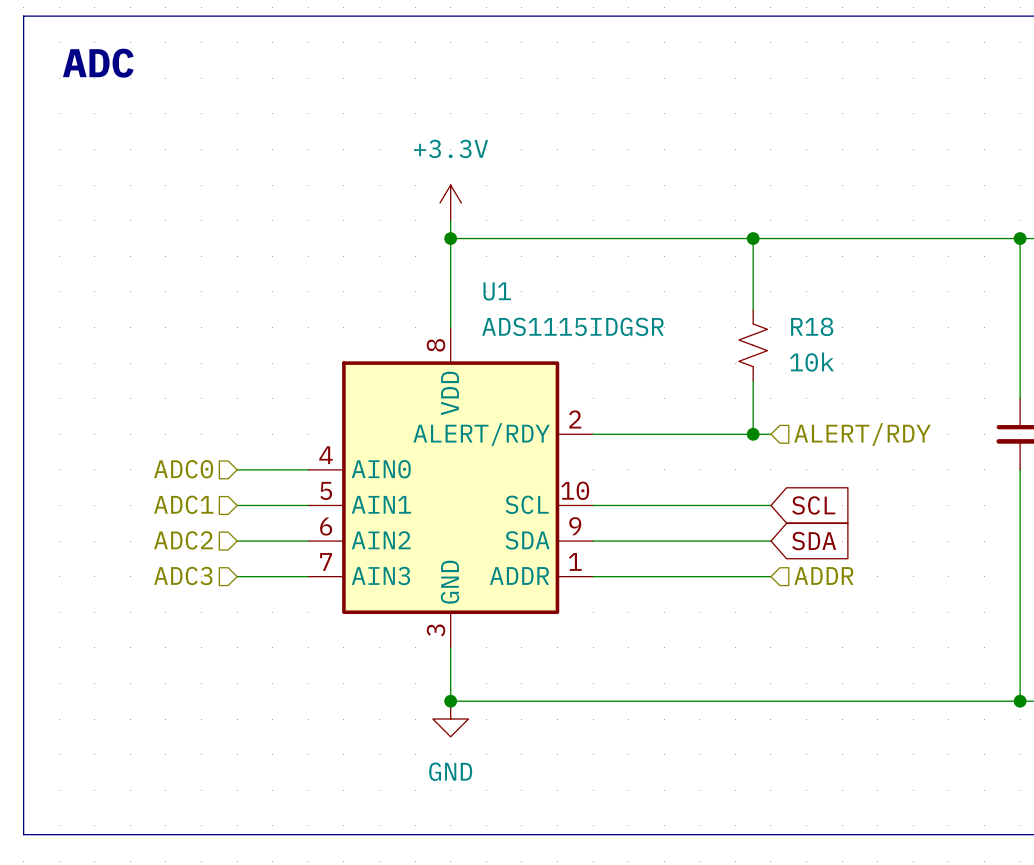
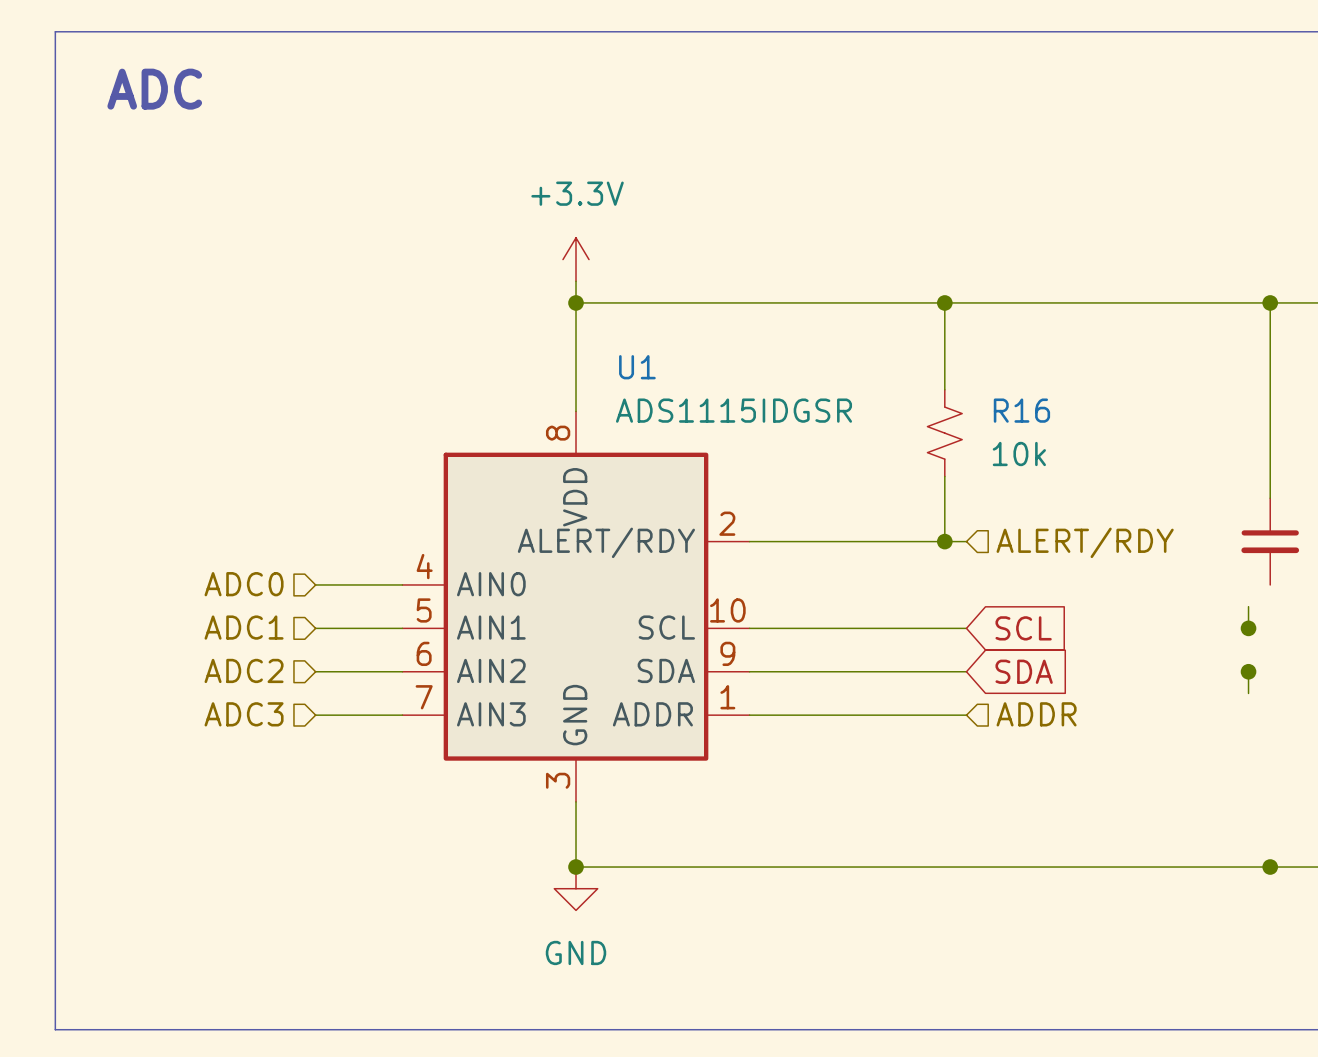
R18 name: R18 (812, 326) -> R16 (1021, 410)
wire: (1020, 469) (1020, 701) -> none
wire: none -> (1248, 606) (1248, 628)
junction: none -> (1248, 628)
wire: none -> (1248, 671) (1248, 693)
junction: none -> (1248, 671)

